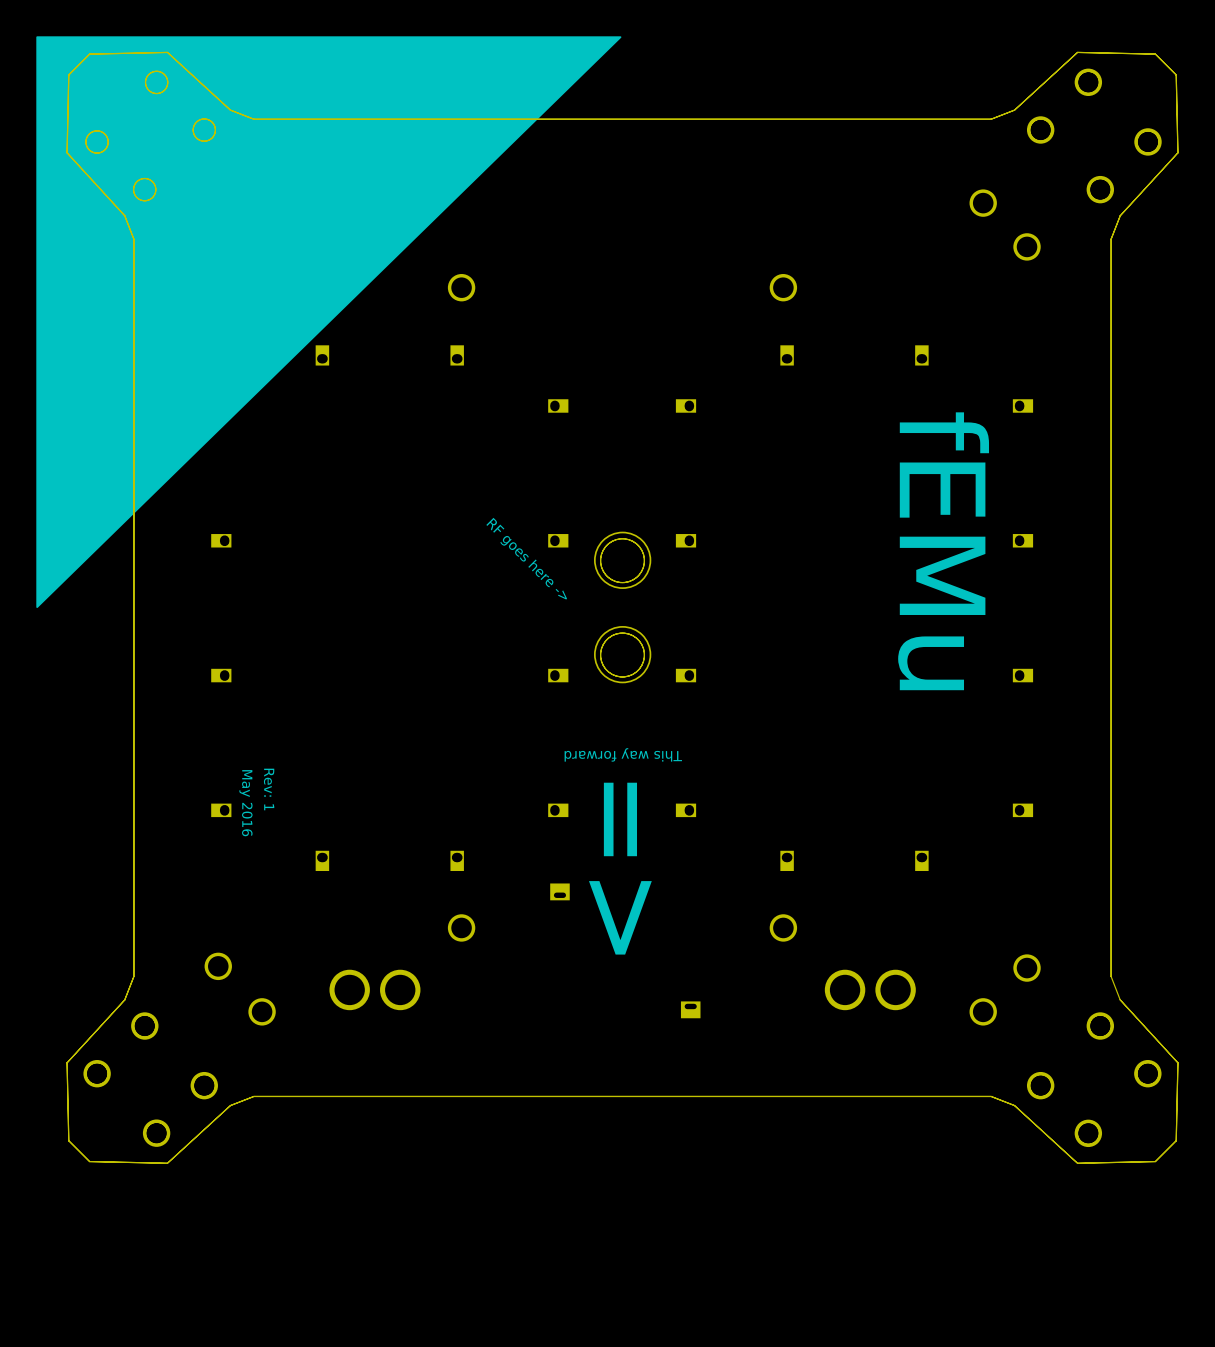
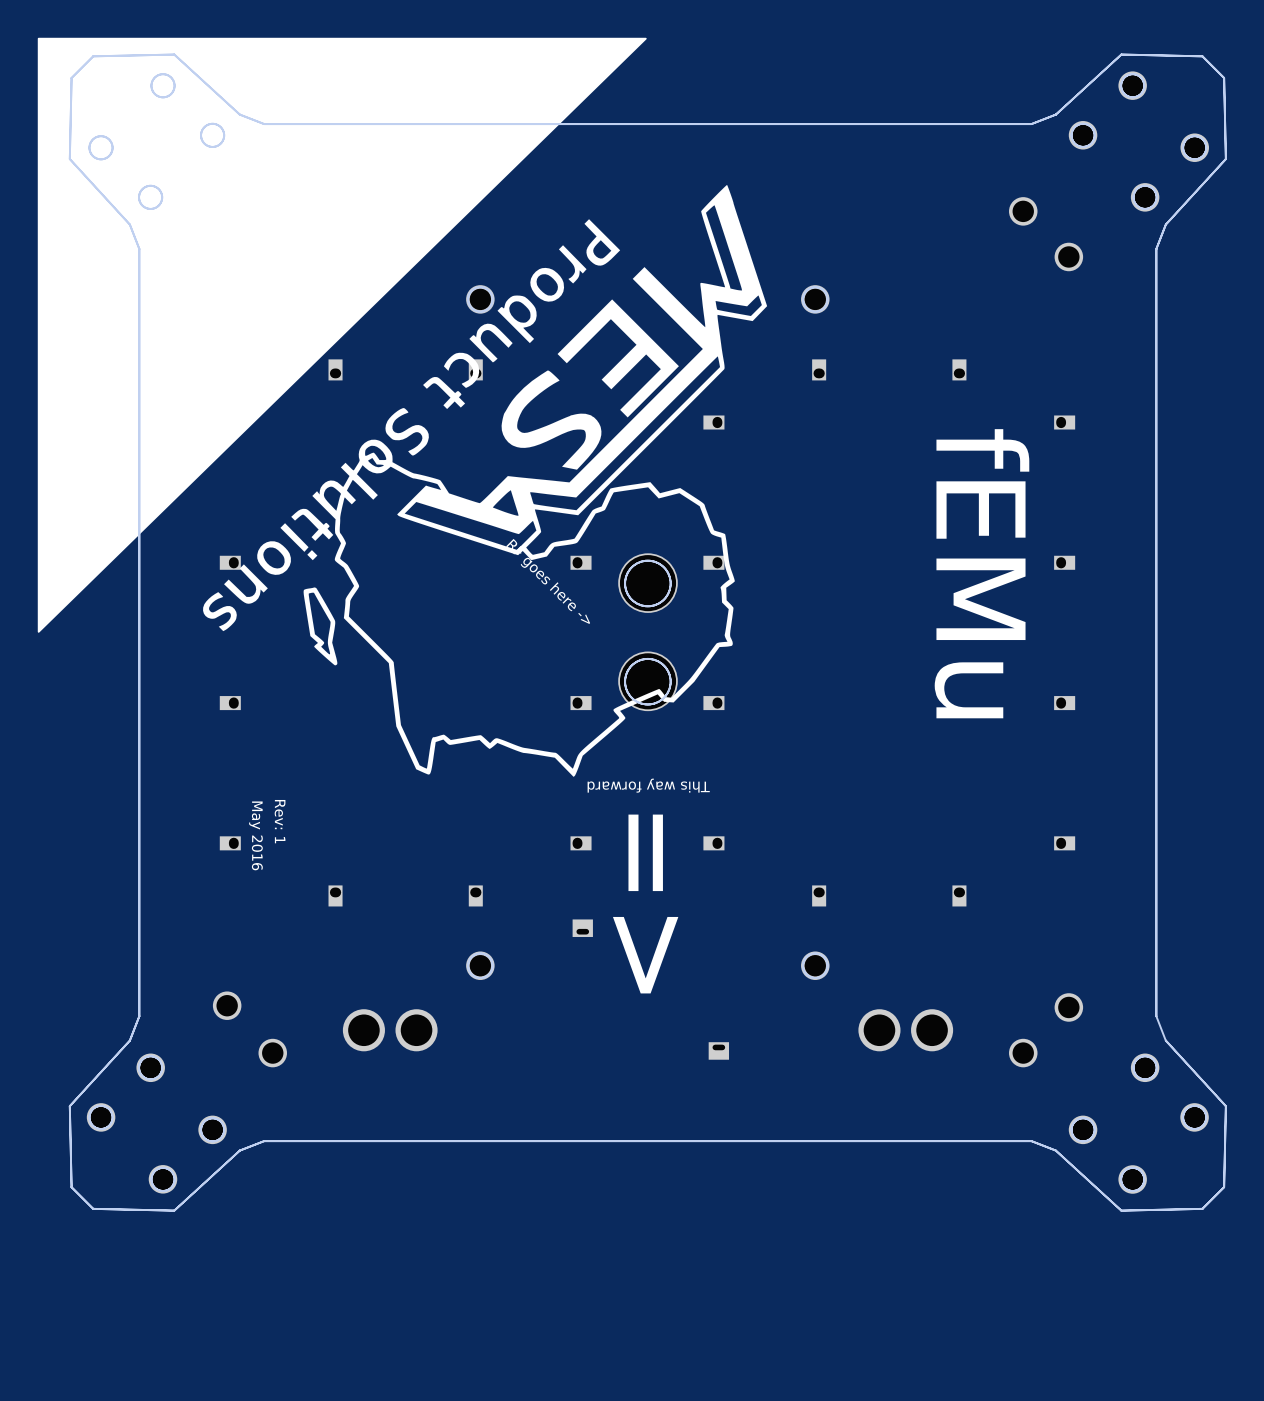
drawing: none -> [203, 184, 768, 777]

